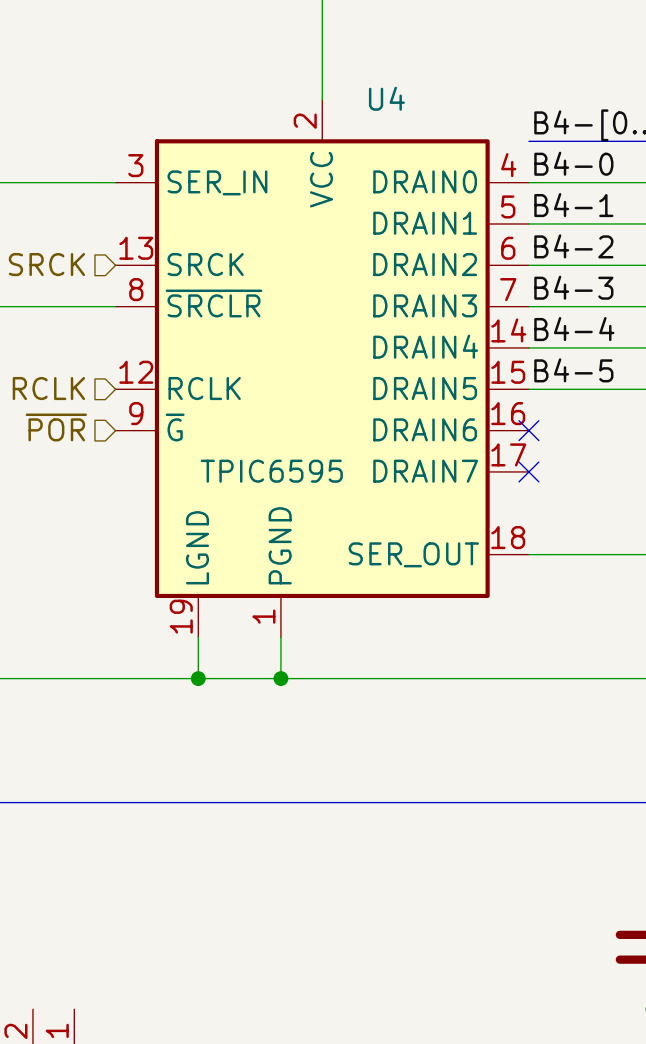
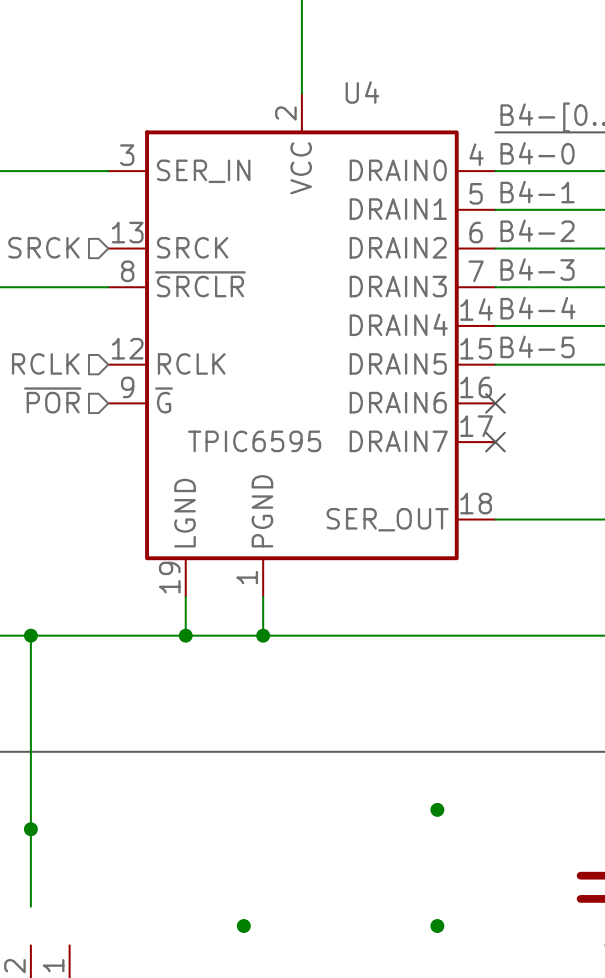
wire: none -> (30, 635) (30, 906)
junction: none -> (30, 635)
junction: none -> (437, 809)
junction: none -> (30, 829)
junction: none -> (243, 926)
junction: none -> (437, 926)

